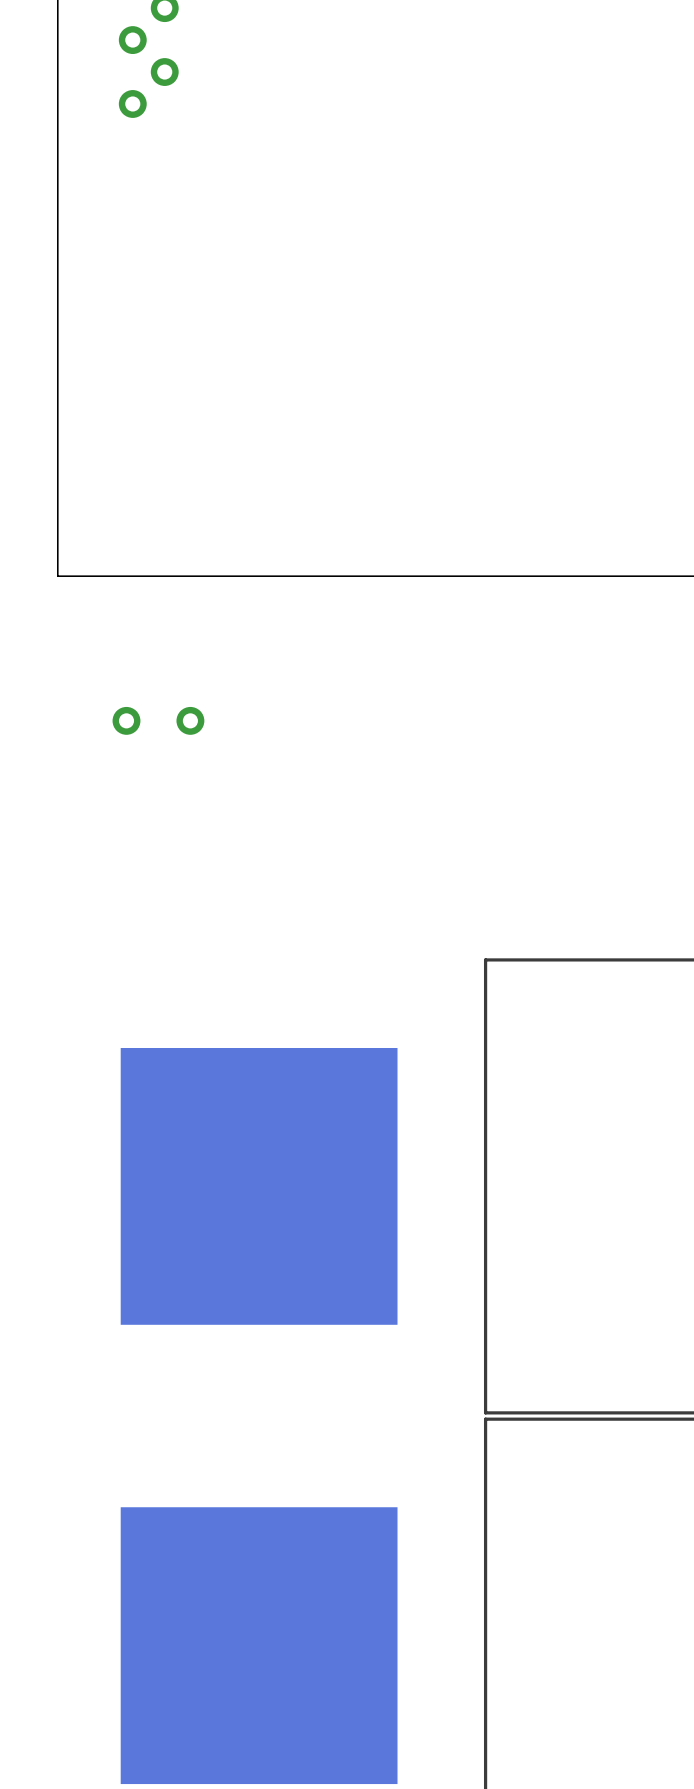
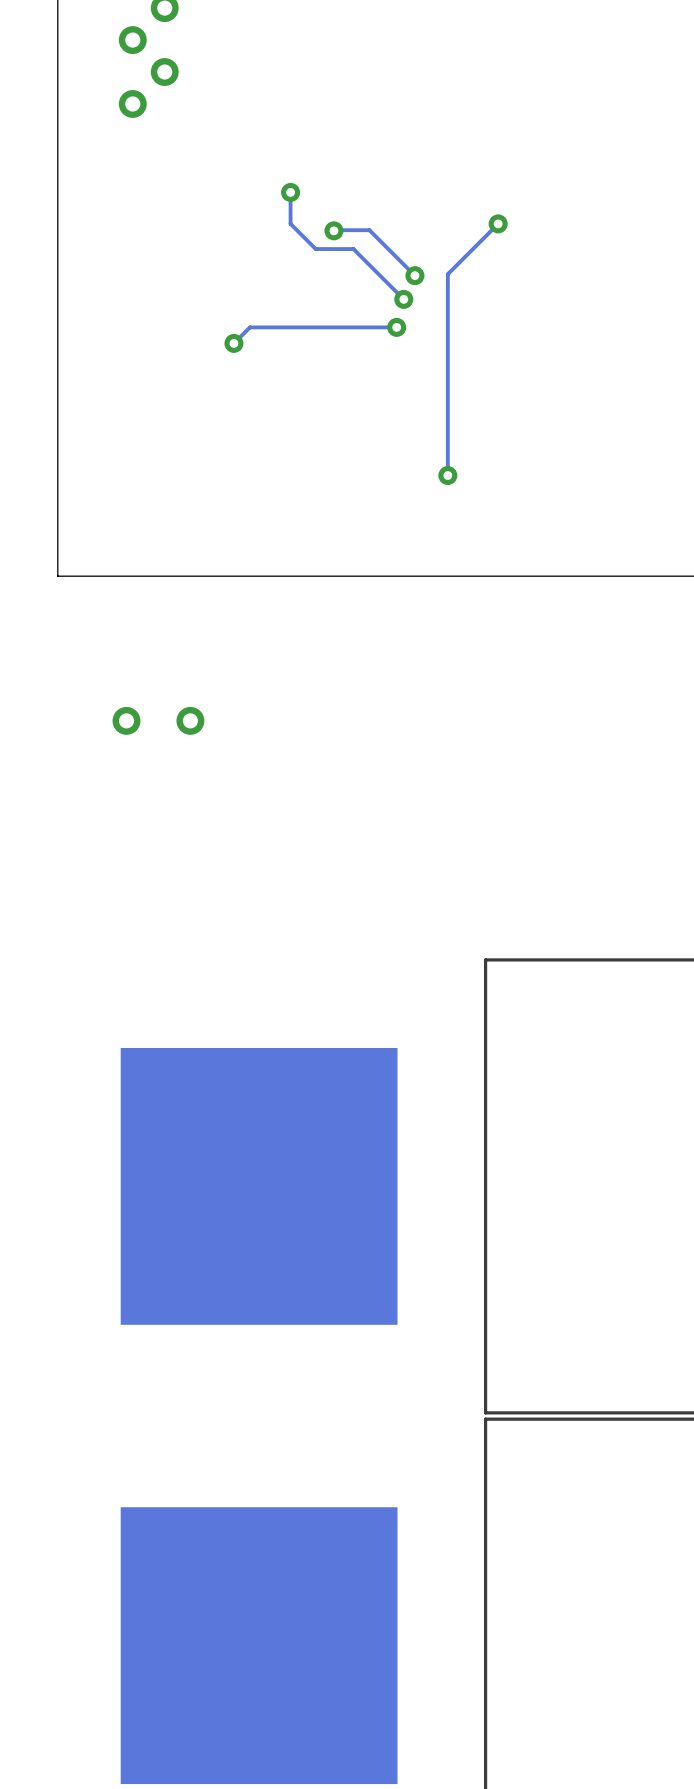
track: none -> (290, 192) (290, 223) (315, 249) (353, 249) (403, 299)
via: none -> (290, 192)
track: none -> (498, 223) (447, 274) (447, 475)
via: none -> (498, 223)
track: none -> (333, 230) (369, 230) (414, 275)
via: none -> (333, 230)
via: none -> (414, 275)
via: none -> (403, 299)
track: none -> (396, 327) (249, 327) (233, 343)
via: none -> (396, 327)
via: none -> (233, 343)
via: none -> (447, 475)

